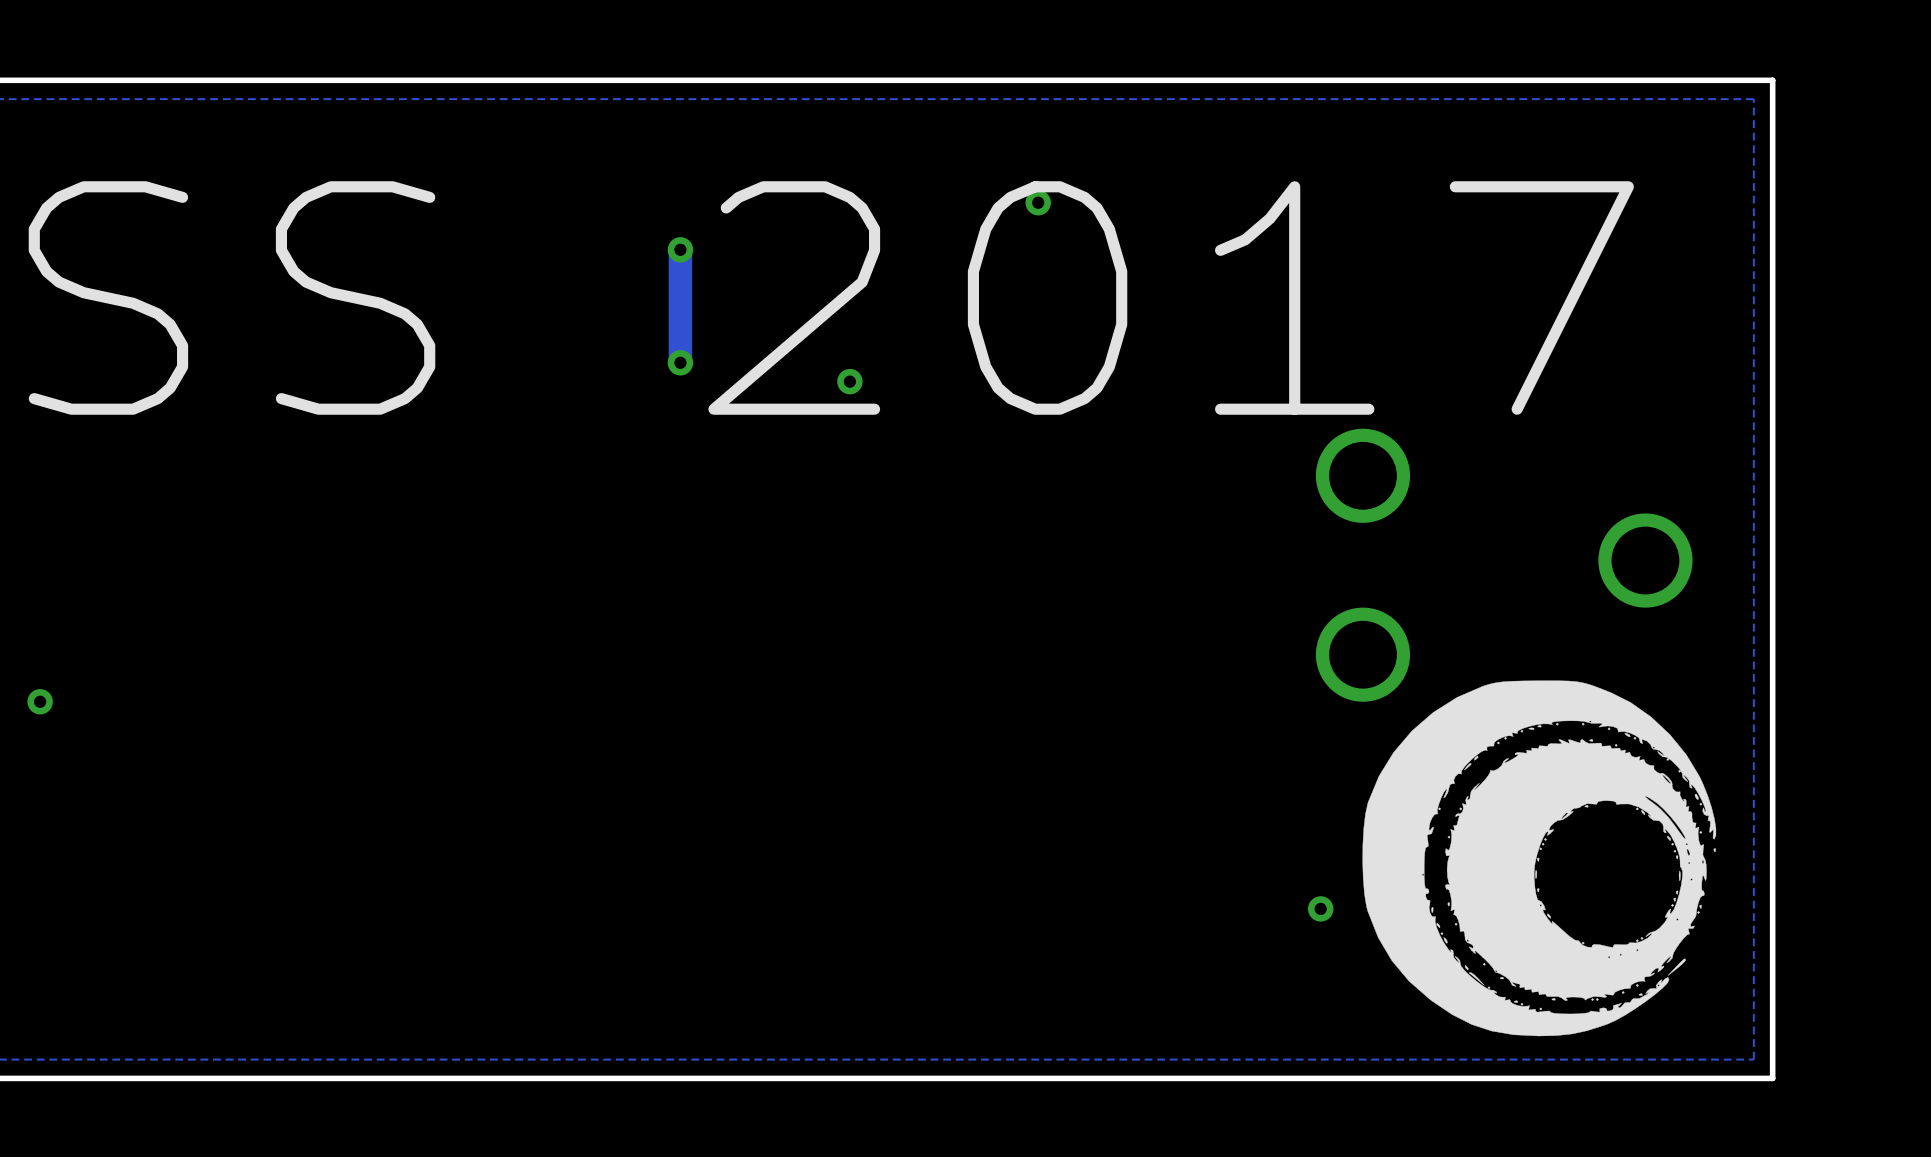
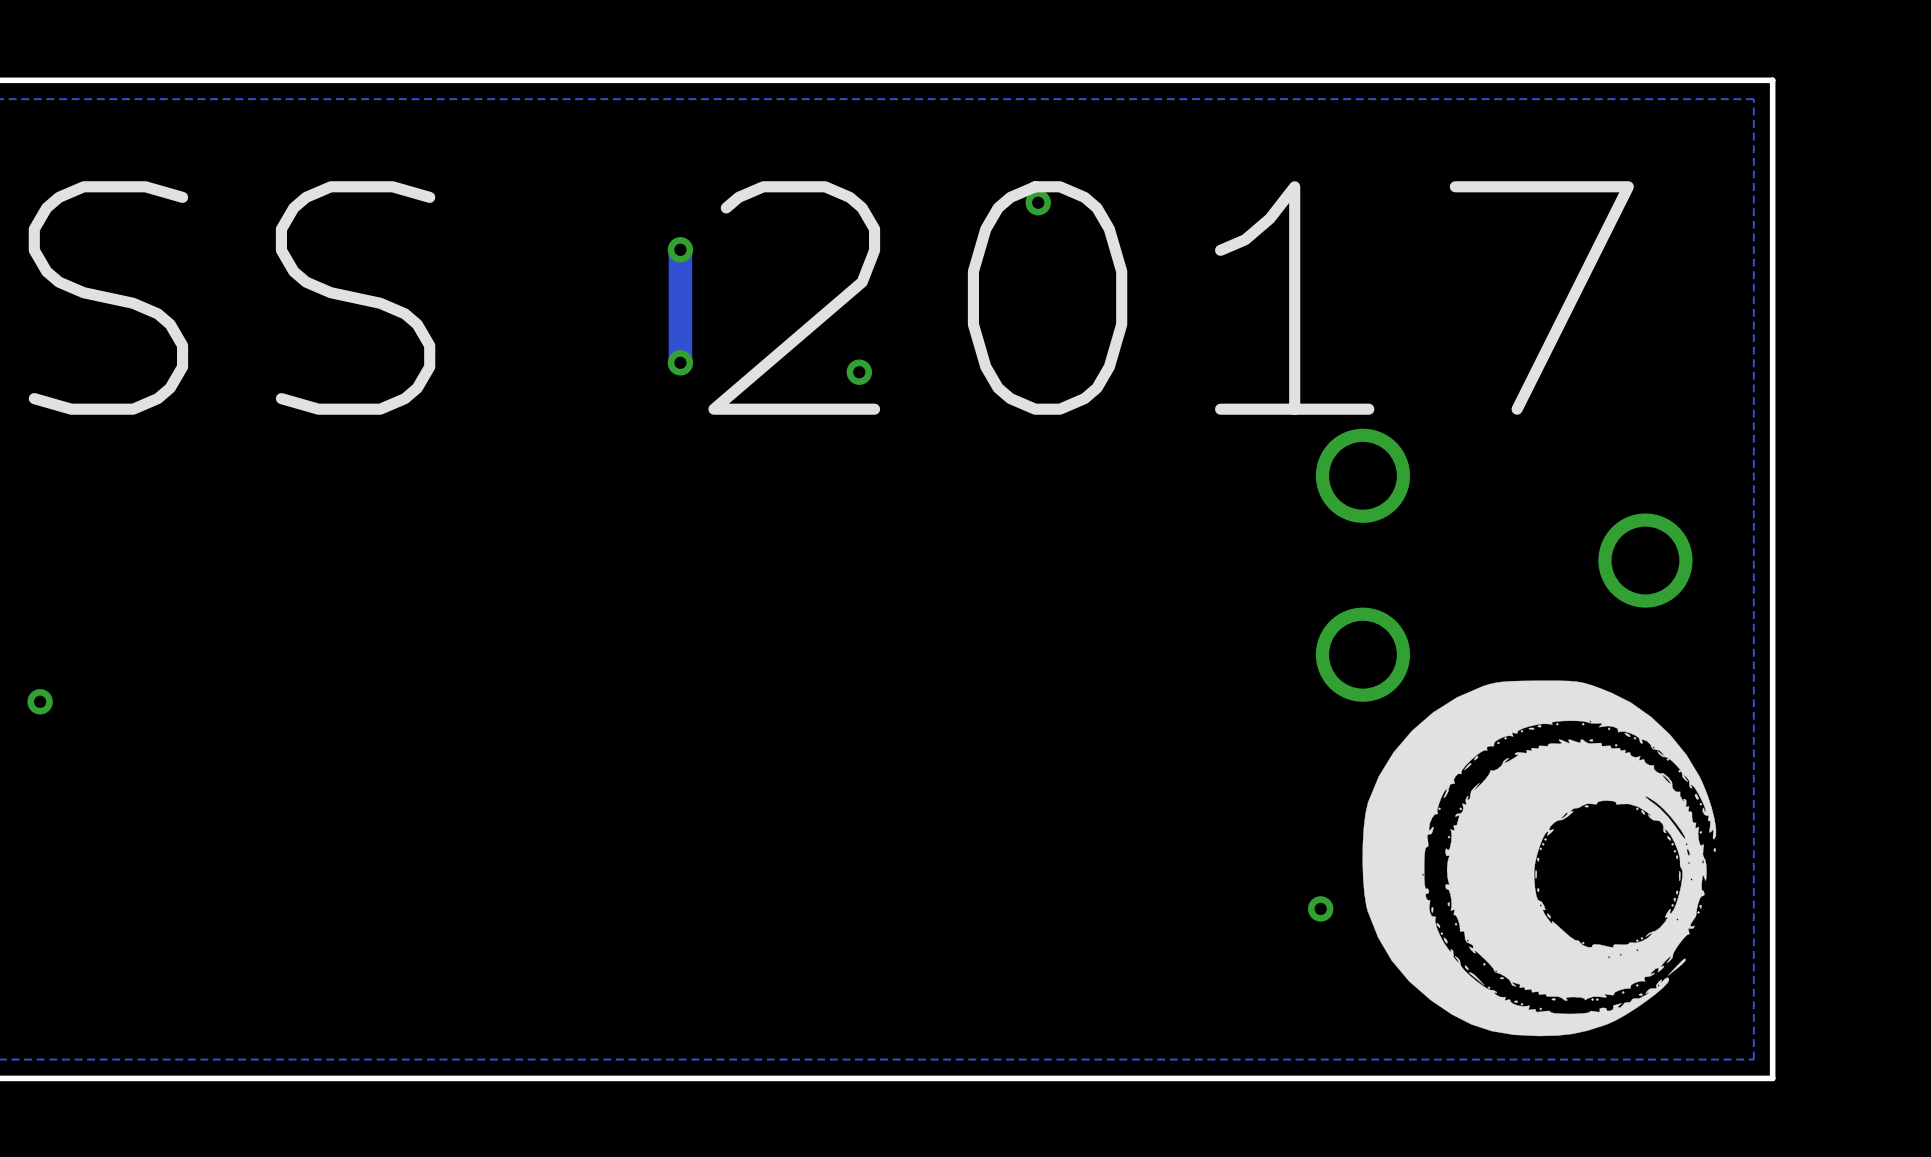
via position: (849, 381) -> (859, 372)

